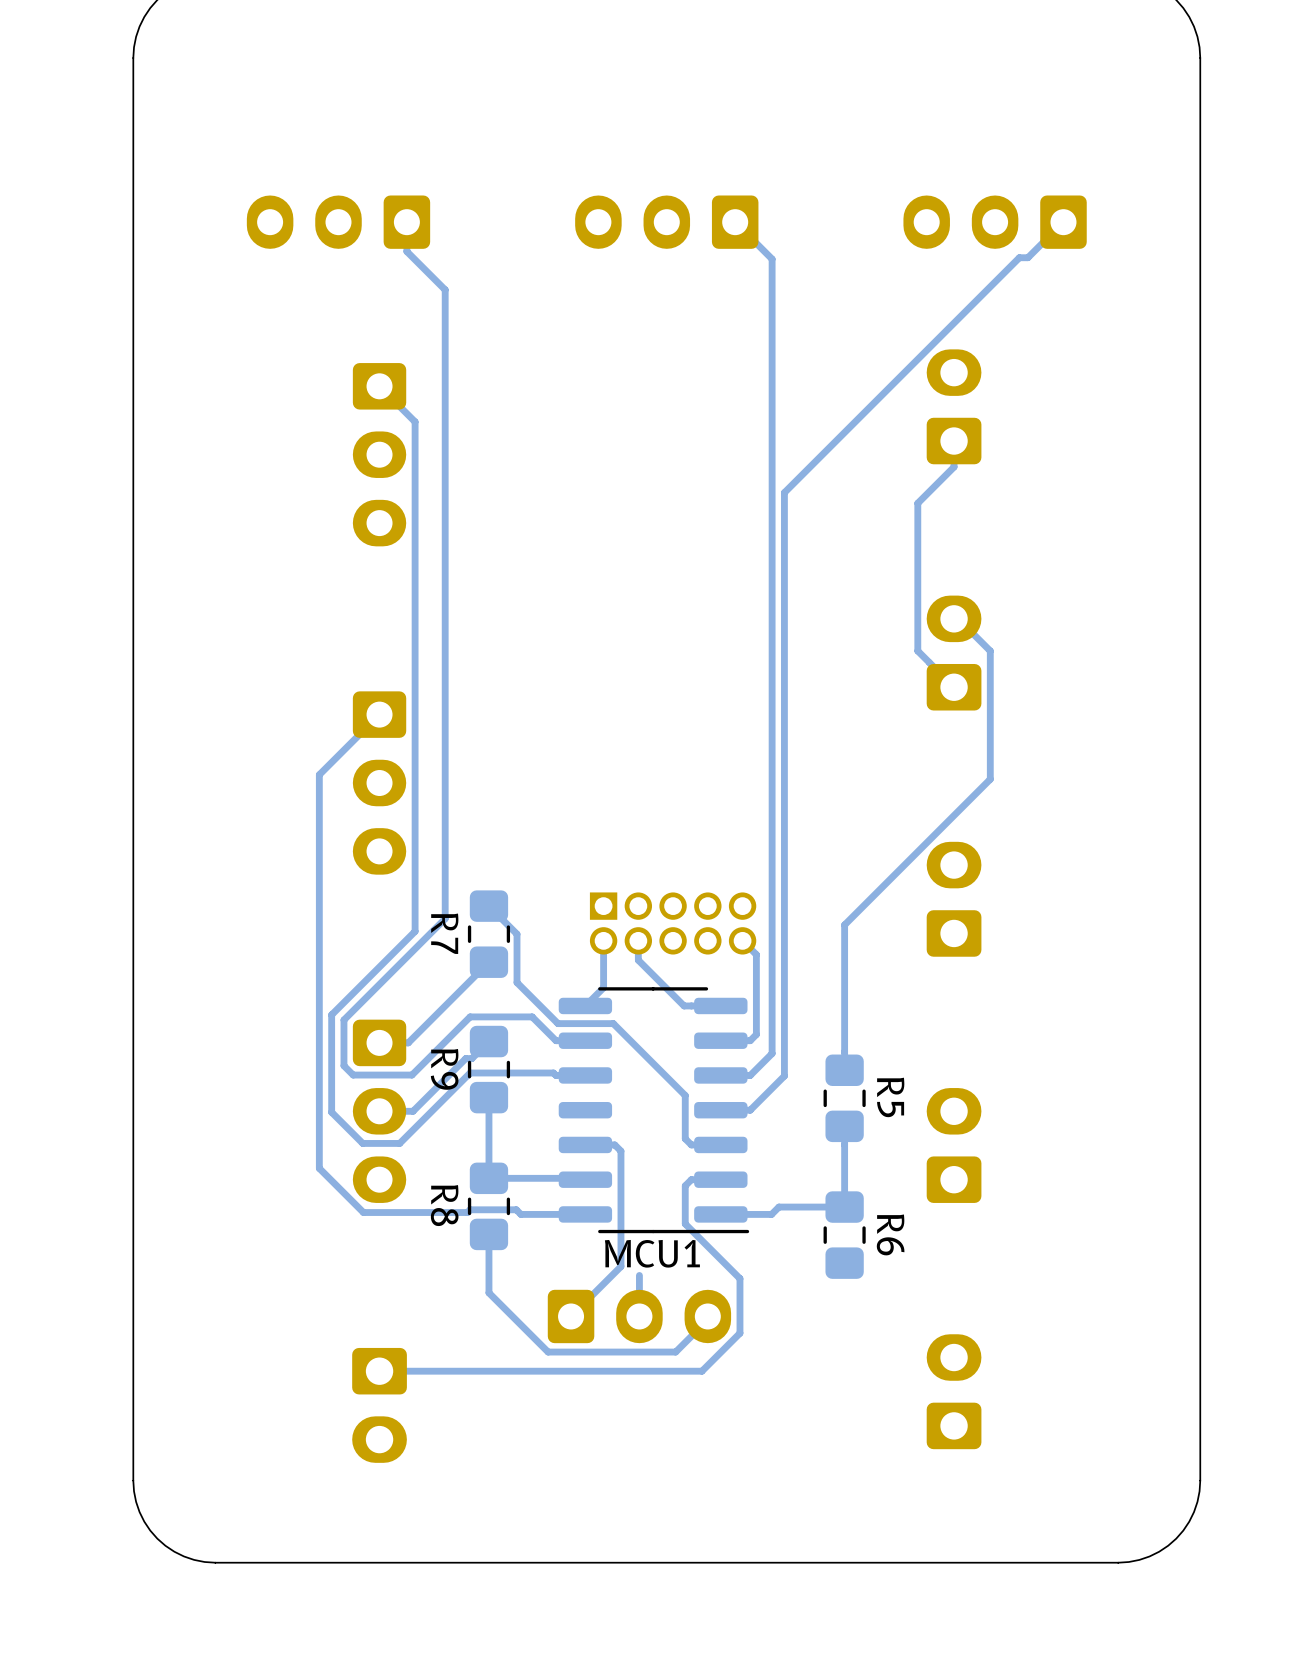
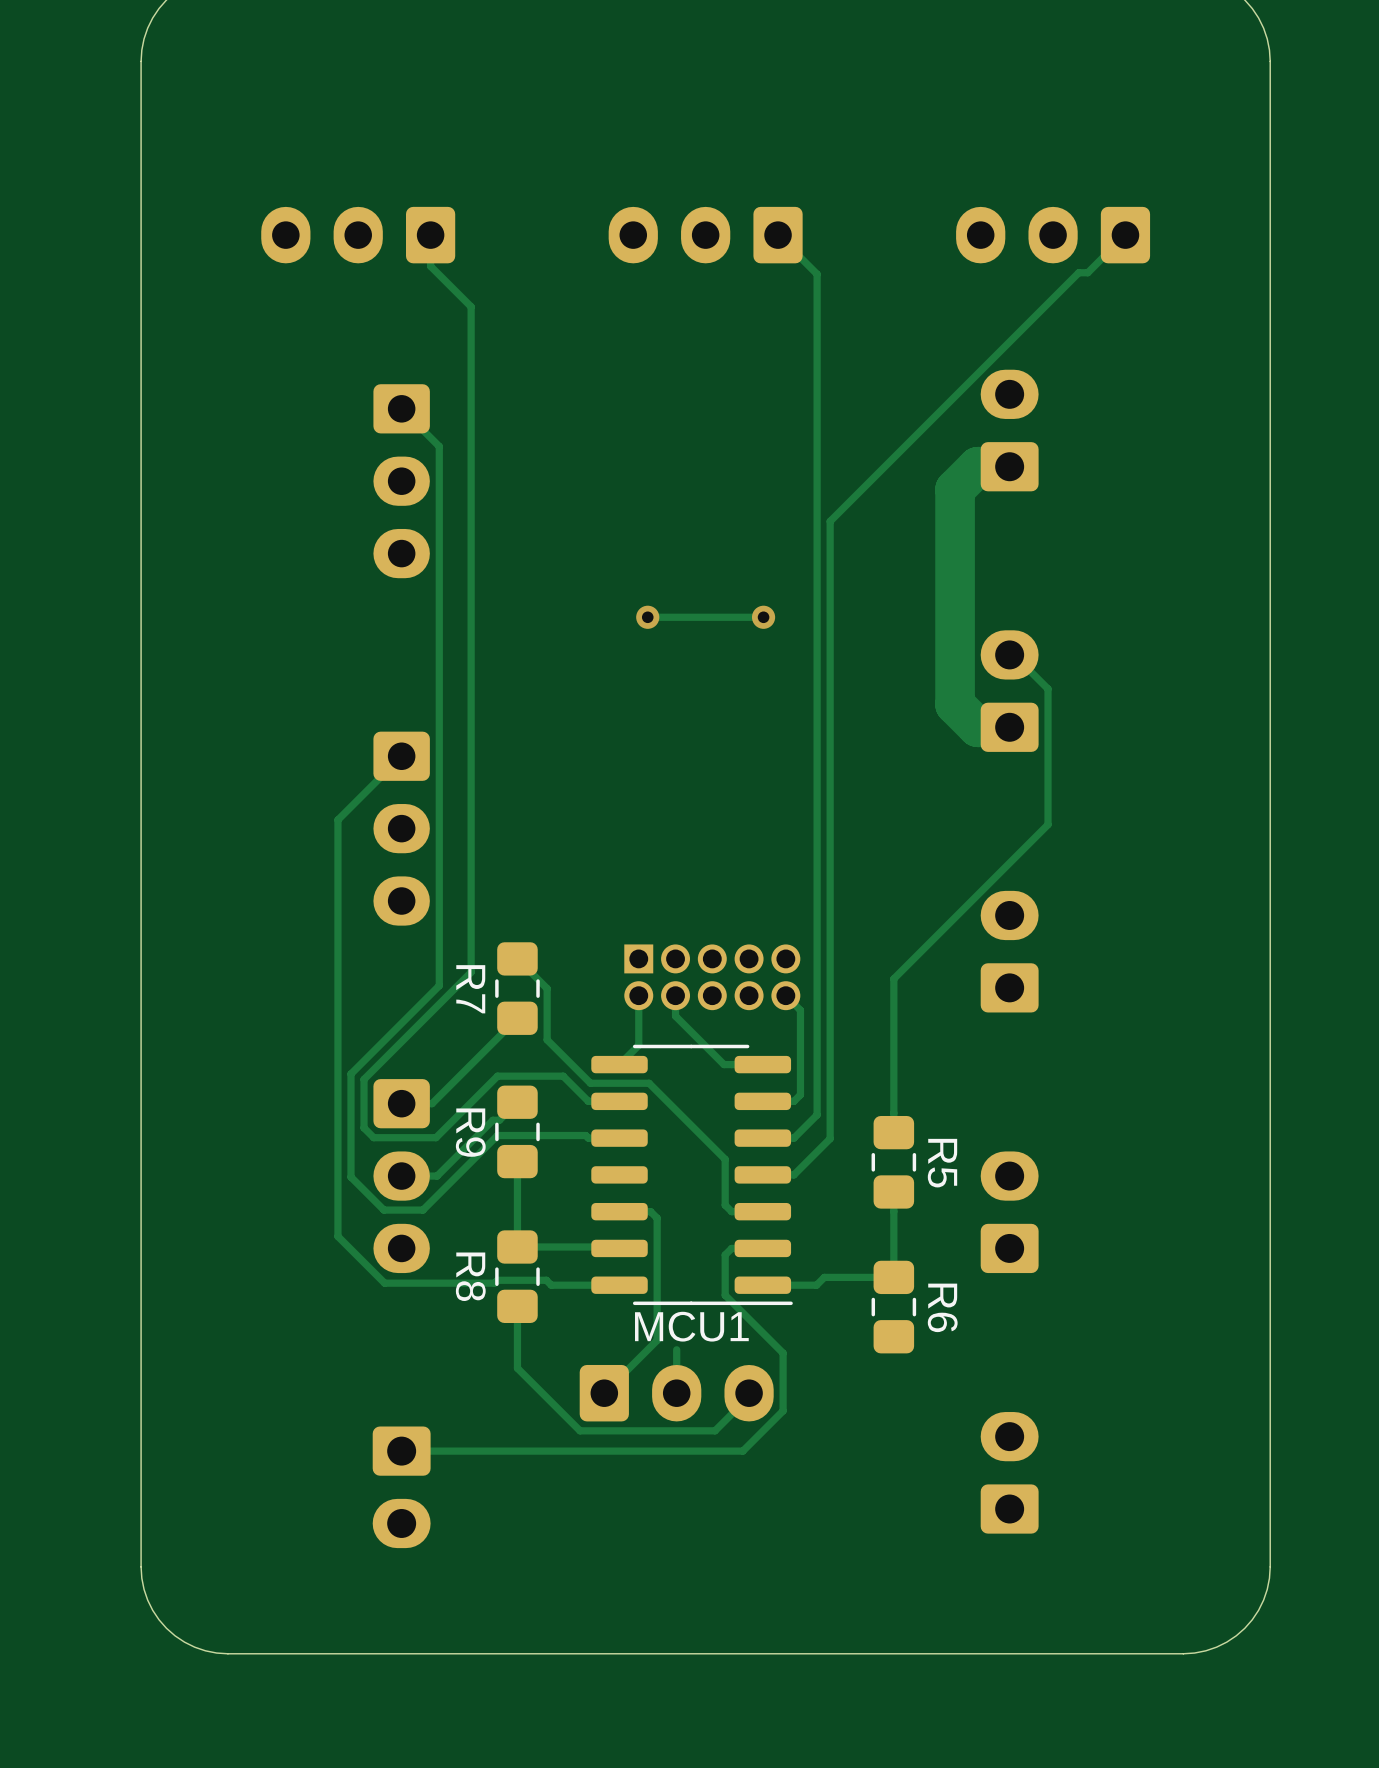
track: (954, 441) (954, 467) (917, 503) (917, 651) (954, 687) -> (1009, 466) (977, 466) (955, 489) (955, 704) (977, 727) (1009, 727)
via: none -> (647, 617)
track: none -> (763, 617) (647, 617)
via: none -> (763, 617)

